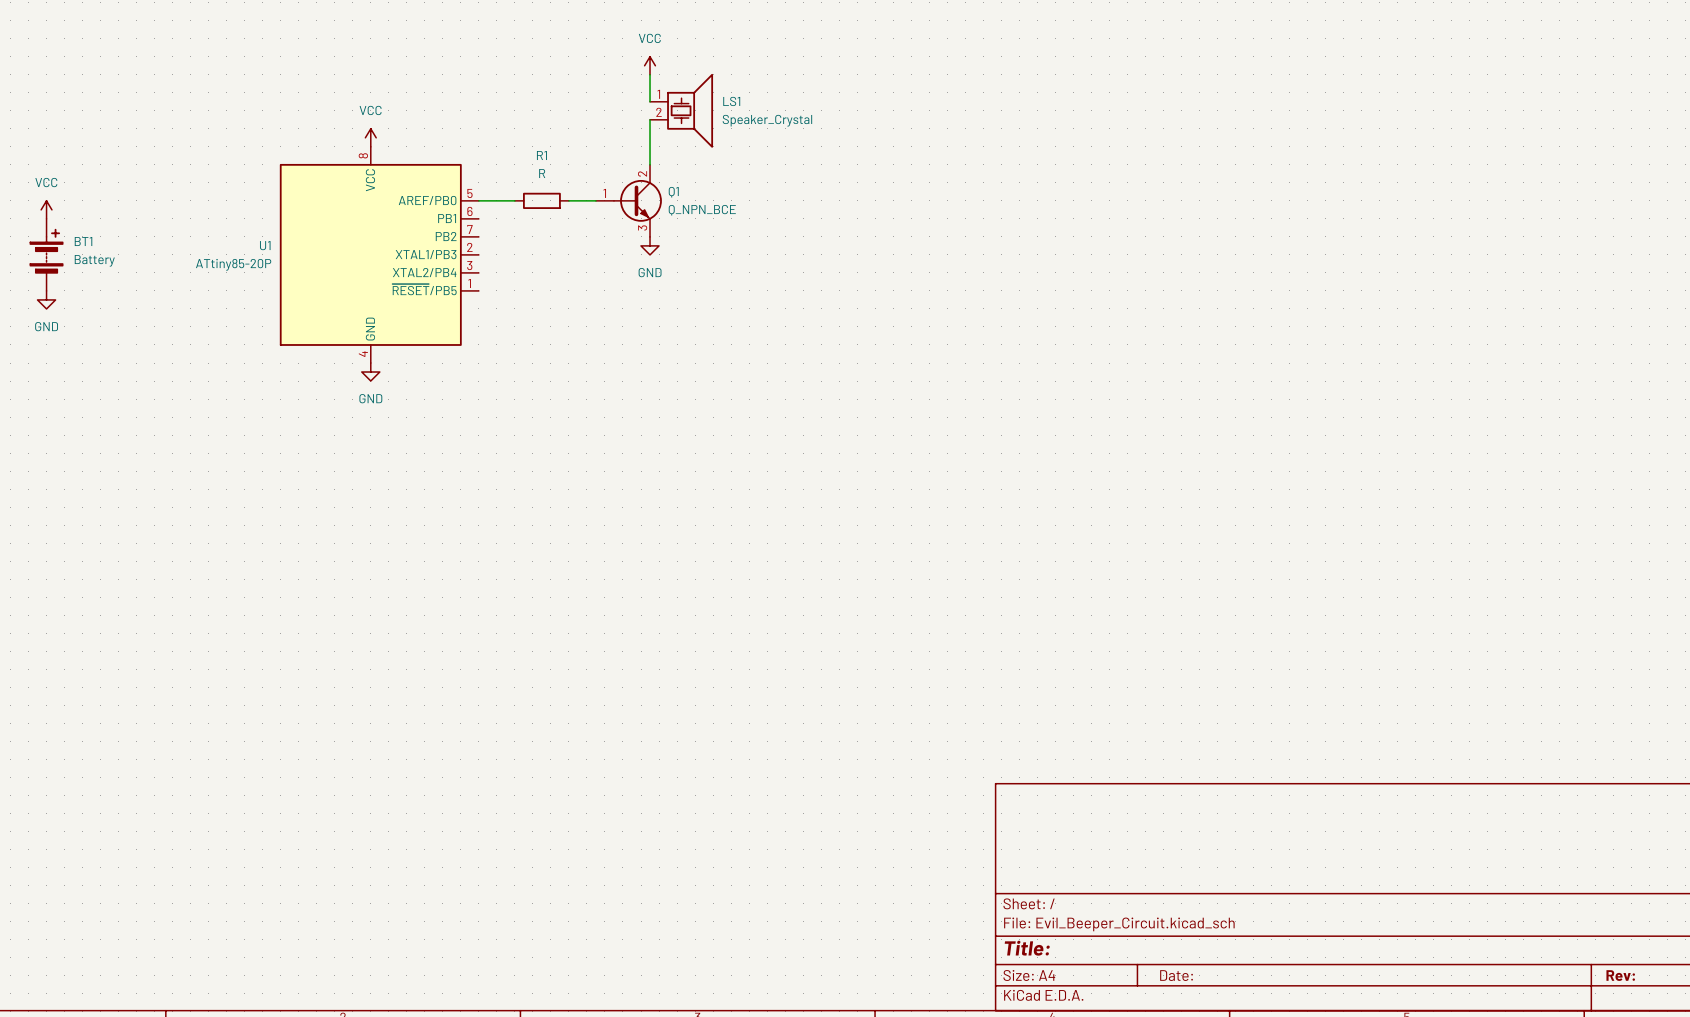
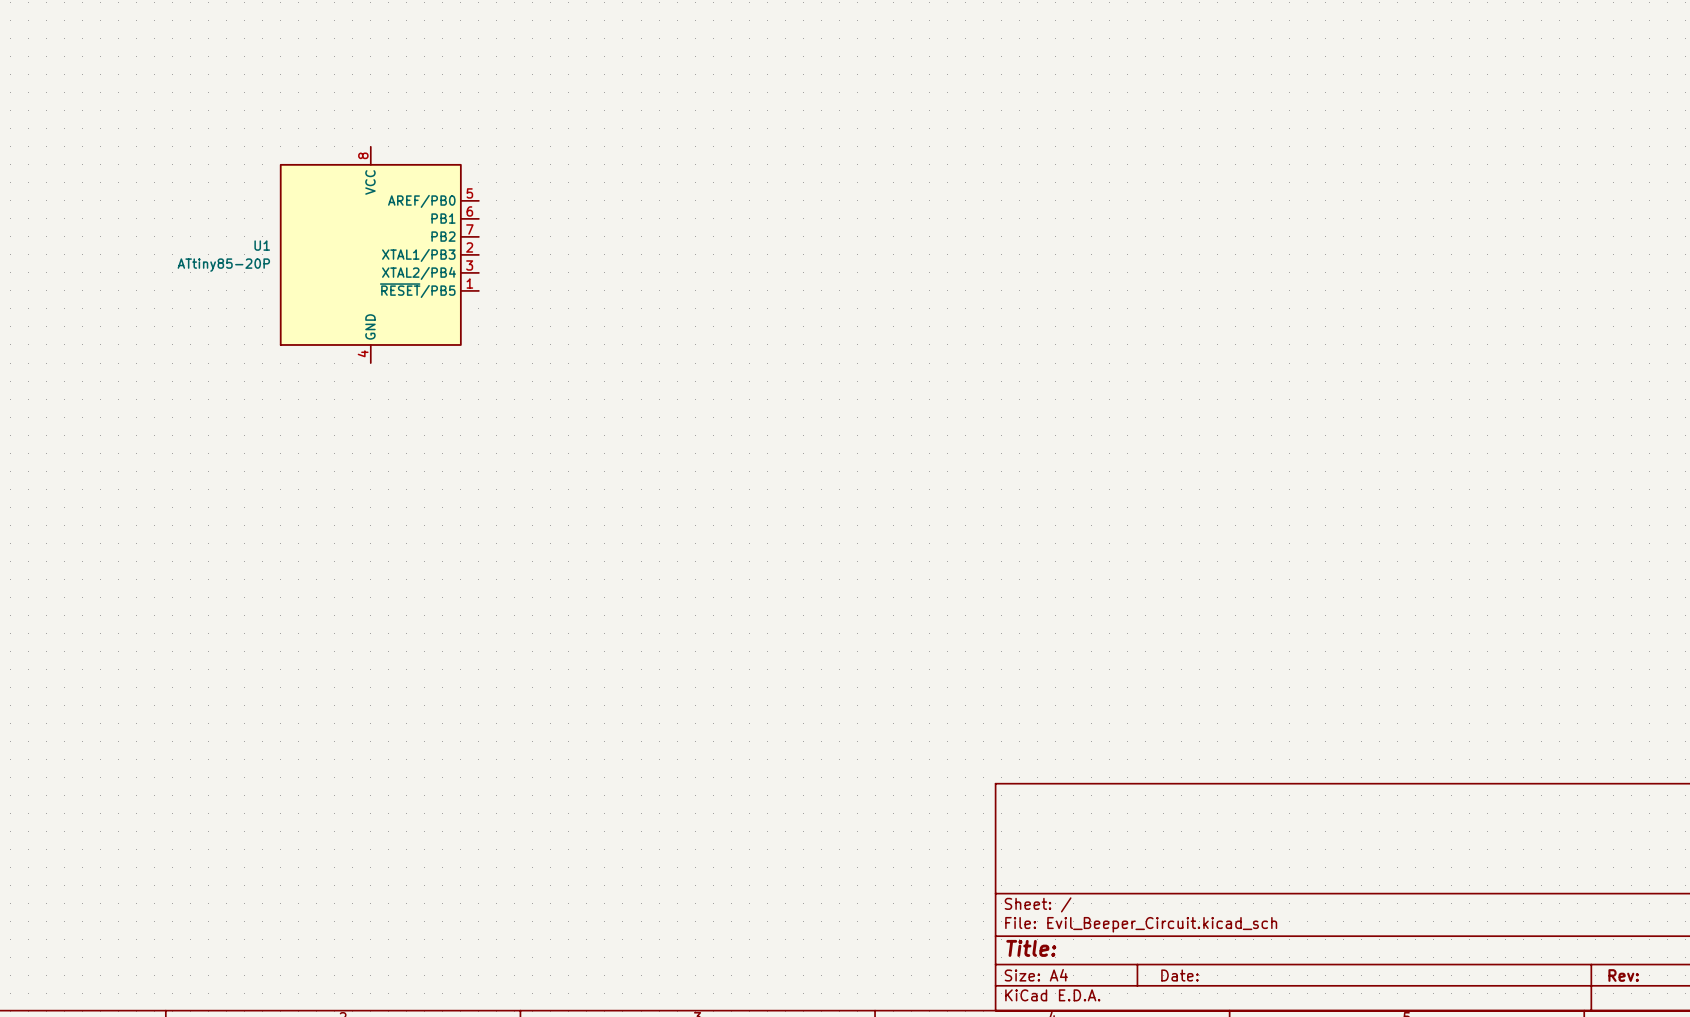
power symbol: VCC (650, 65) -> none
wire: (650, 74) (650, 101) -> none
LS1: Speaker_Crystal (681, 110) -> none
wire: (650, 119) (650, 164) -> none
power symbol: VCC (370, 137) -> none
wire: (478, 200) (514, 200) -> none
R1: R (541, 200) -> none
wire: (568, 200) (595, 200) -> none
Q1: Q_NPN_BCE (628, 200) -> none
power symbol: VCC (46, 209) -> none
power symbol: GND (650, 245) -> none
BT1: Battery (46, 254) -> none
power symbol: GND (46, 299) -> none
power symbol: GND (370, 372) -> none

